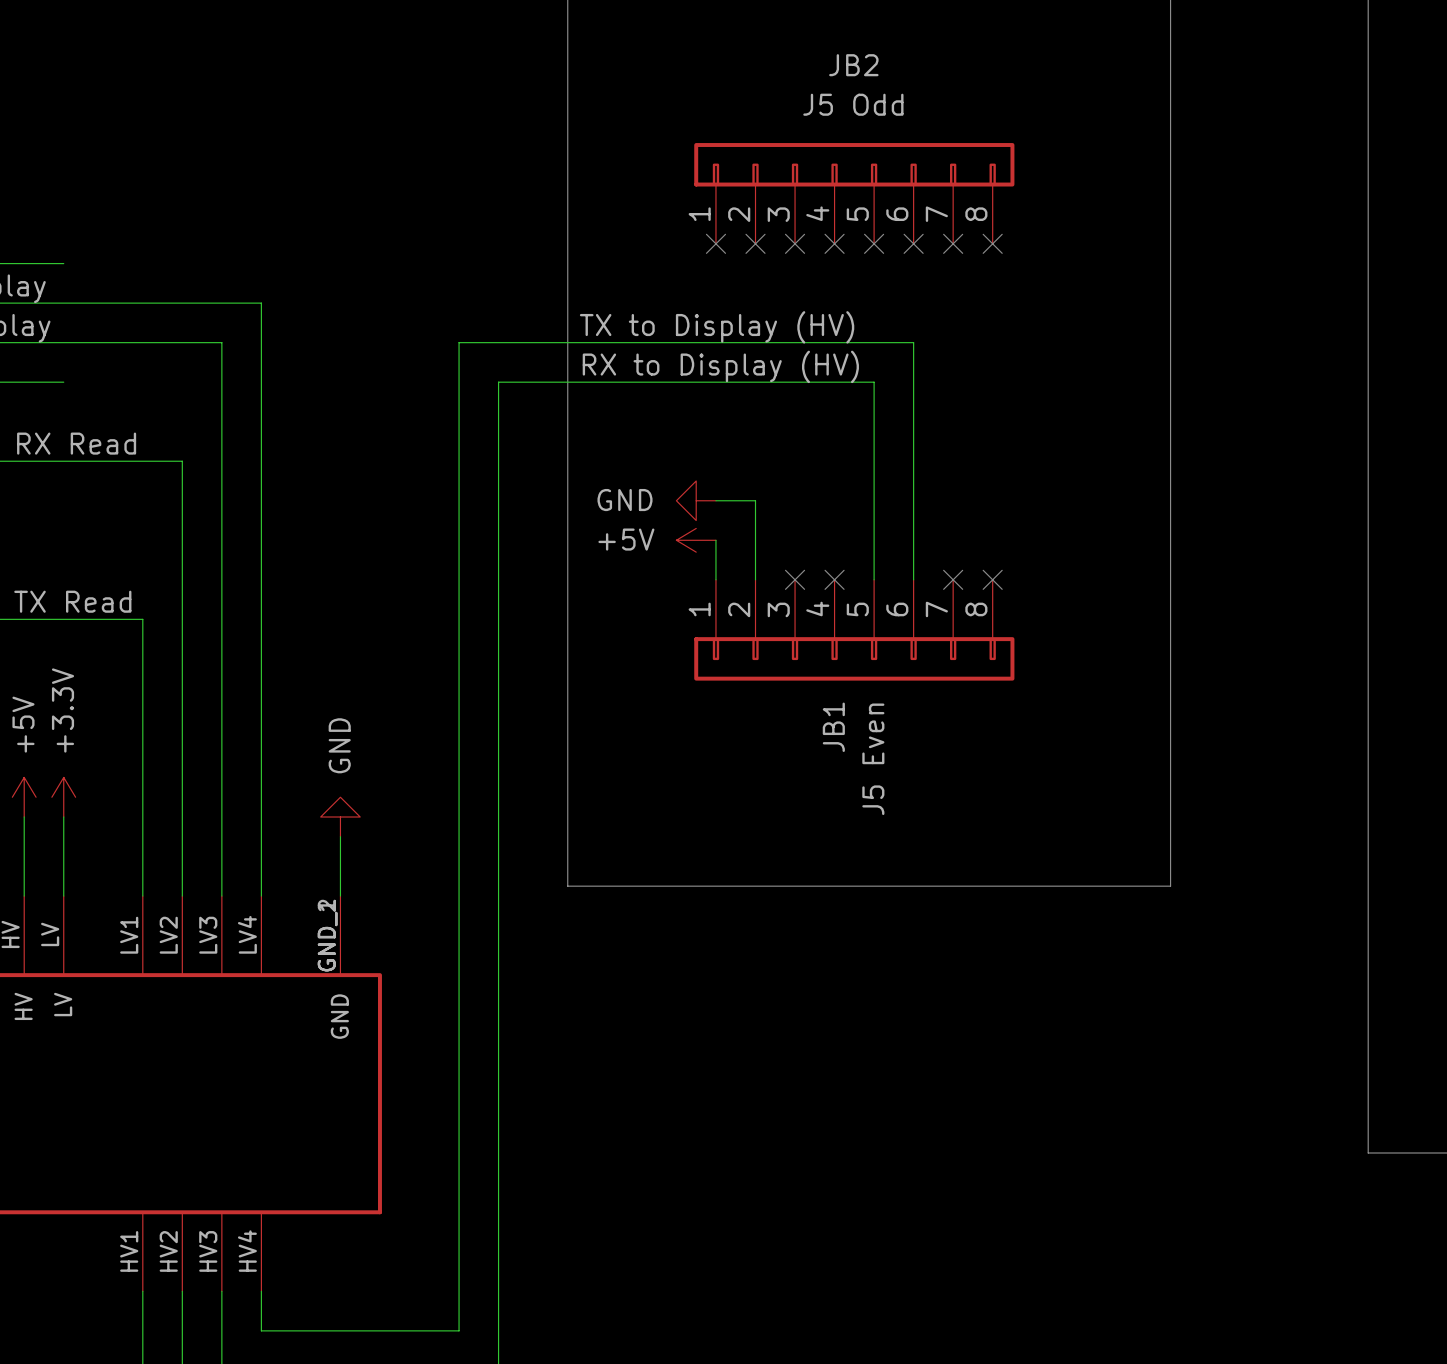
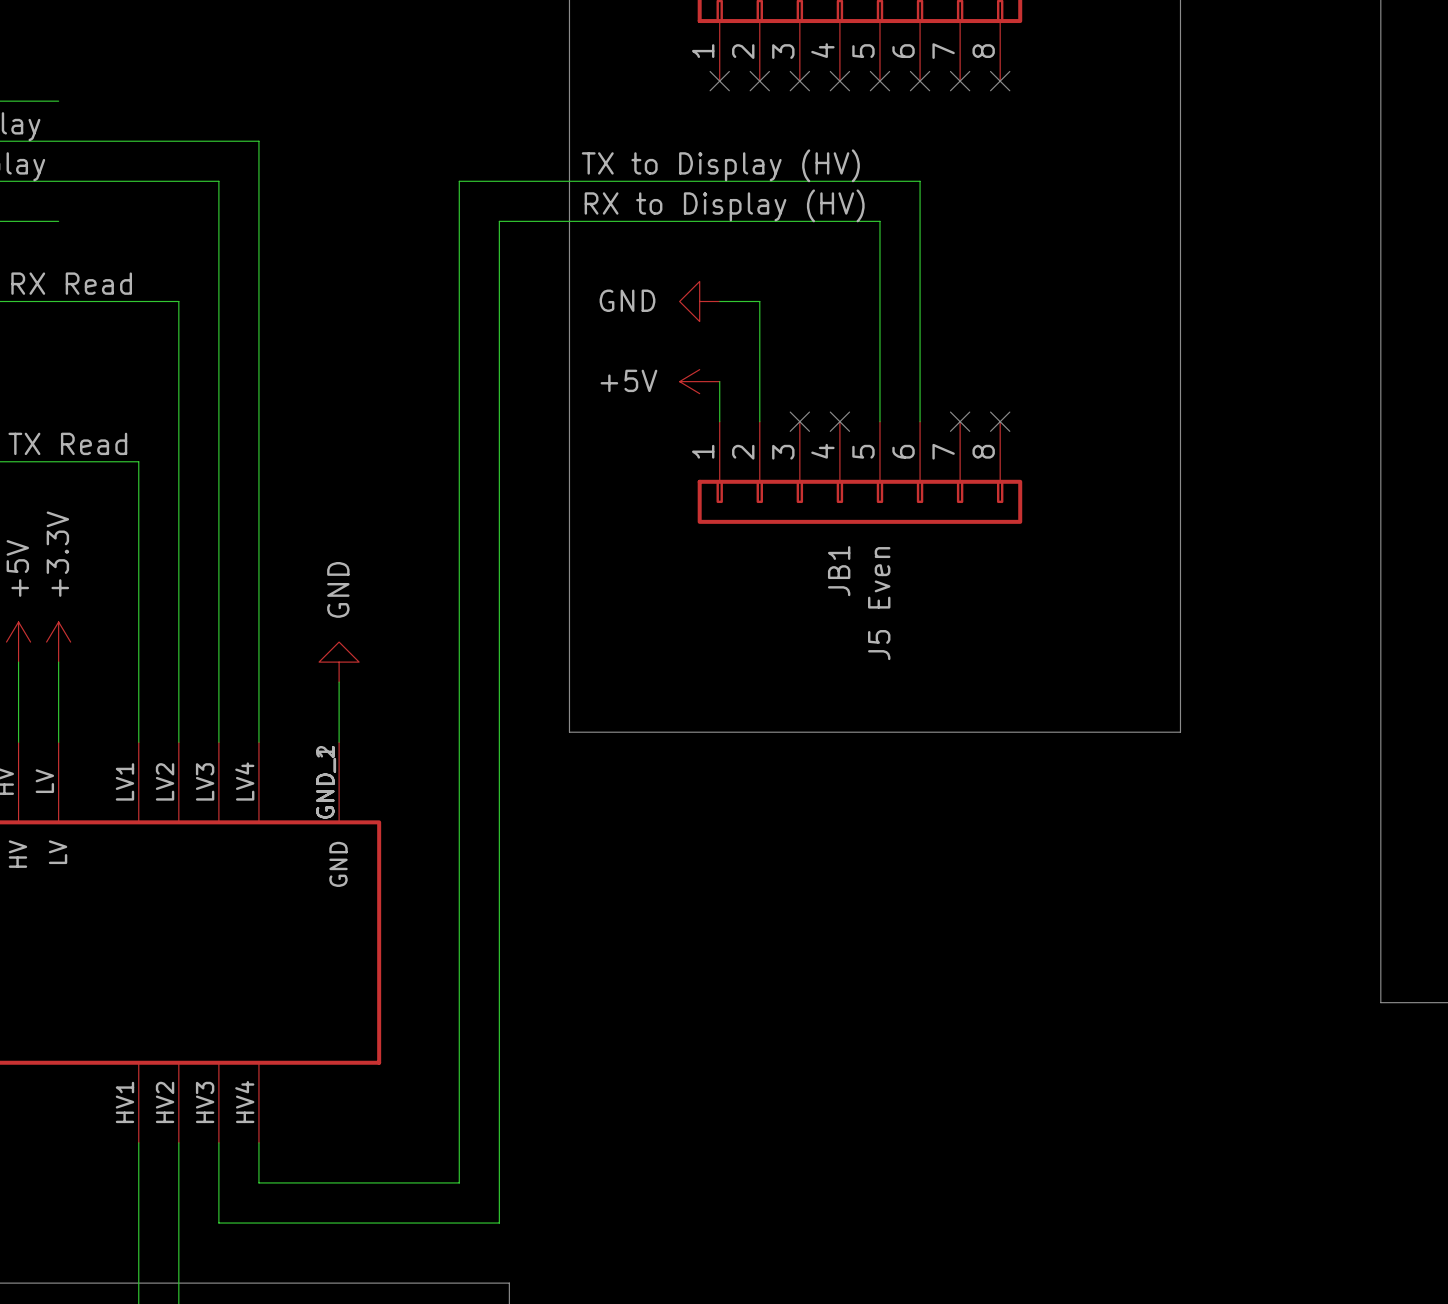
power symbol position: GND (696, 500) -> GND (699, 301)
wire: (715, 500) (755, 500) -> (719, 301) (759, 301) (759, 341)

